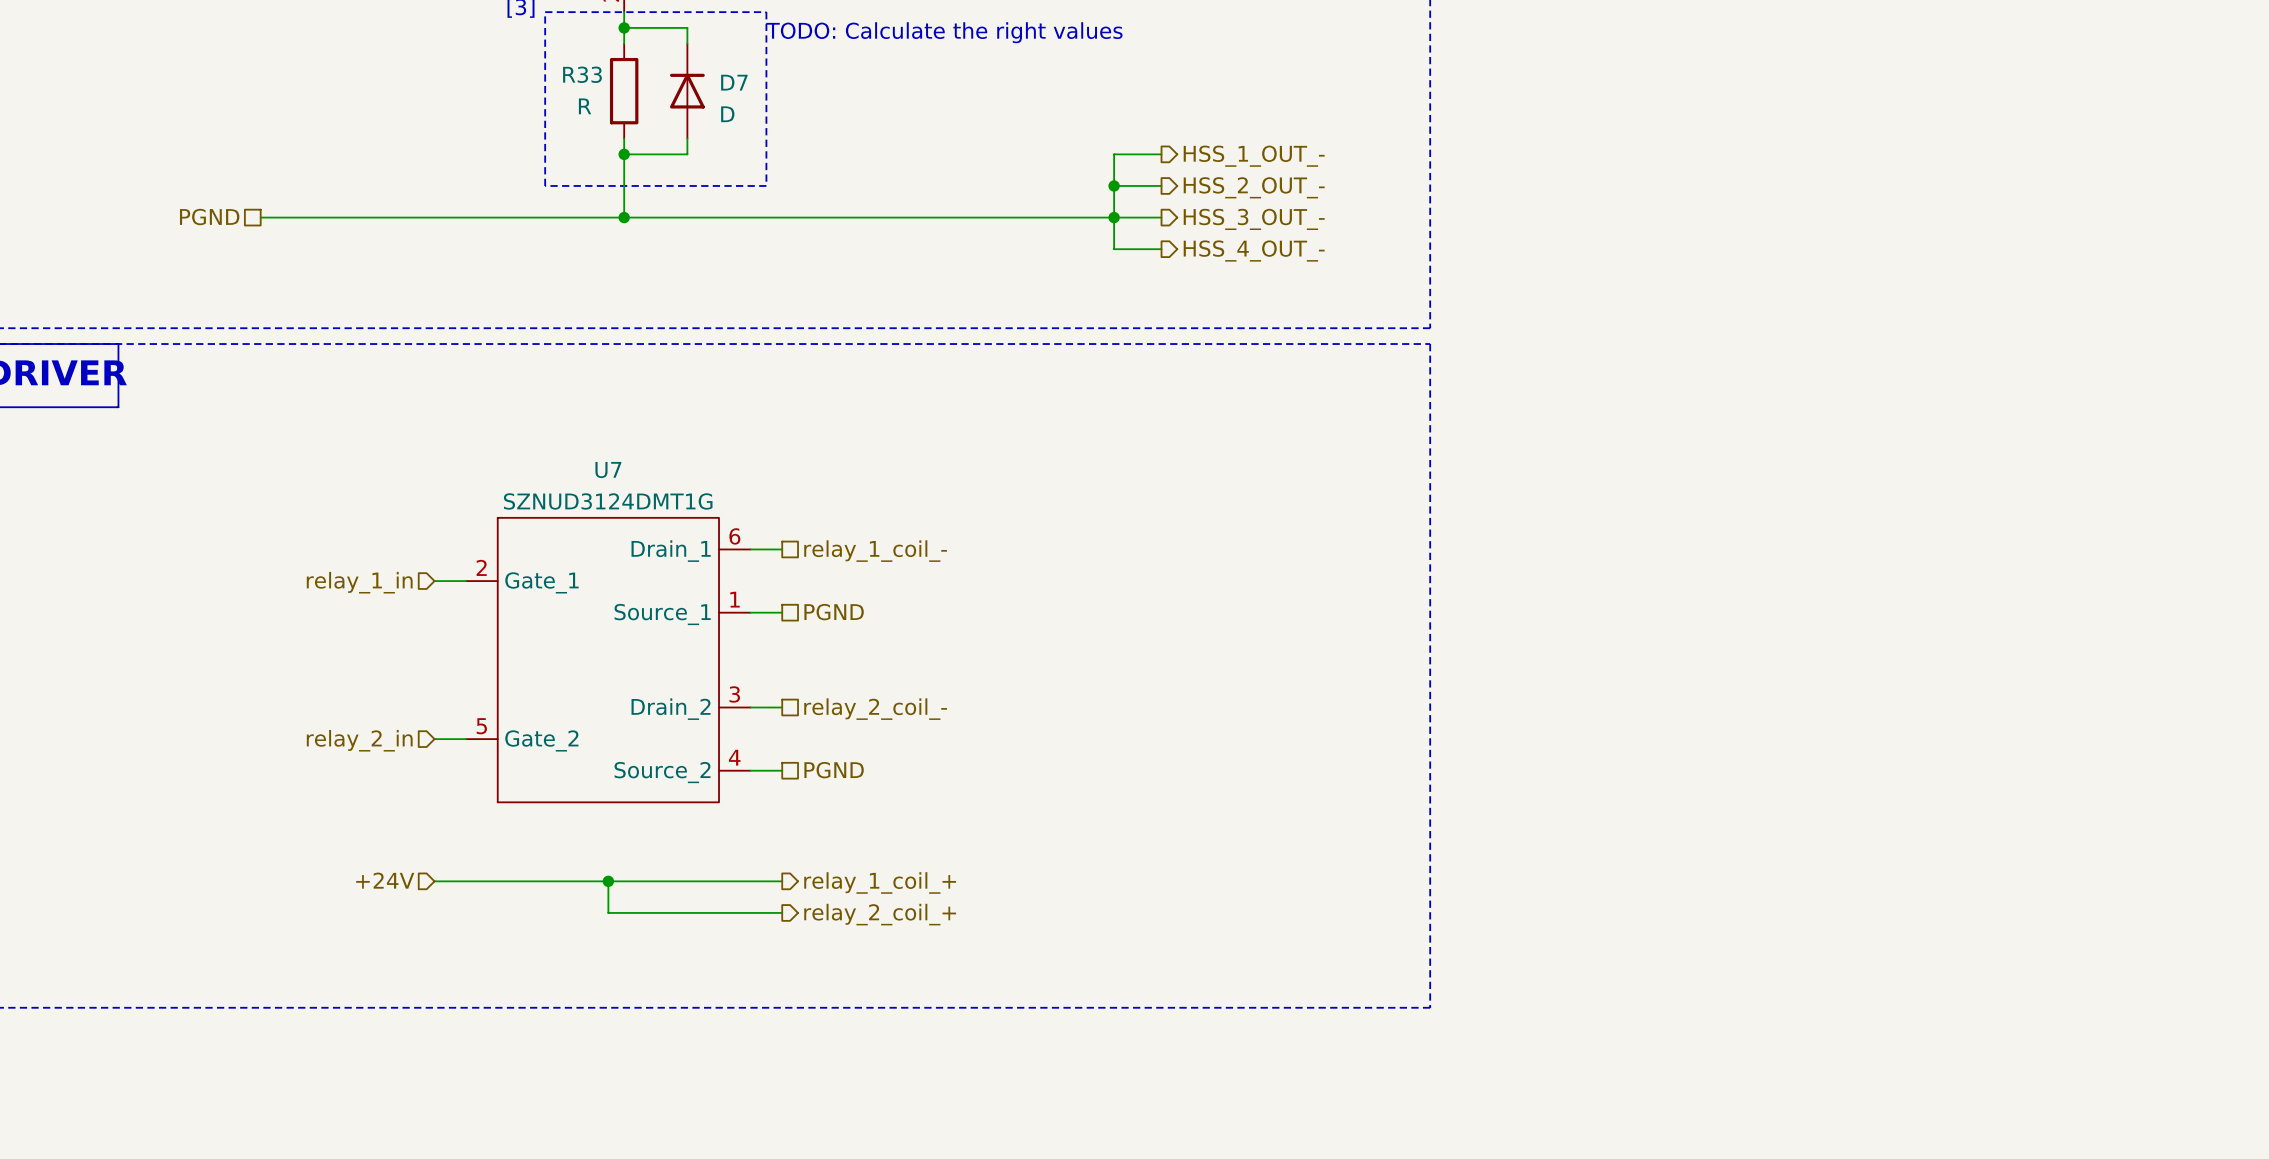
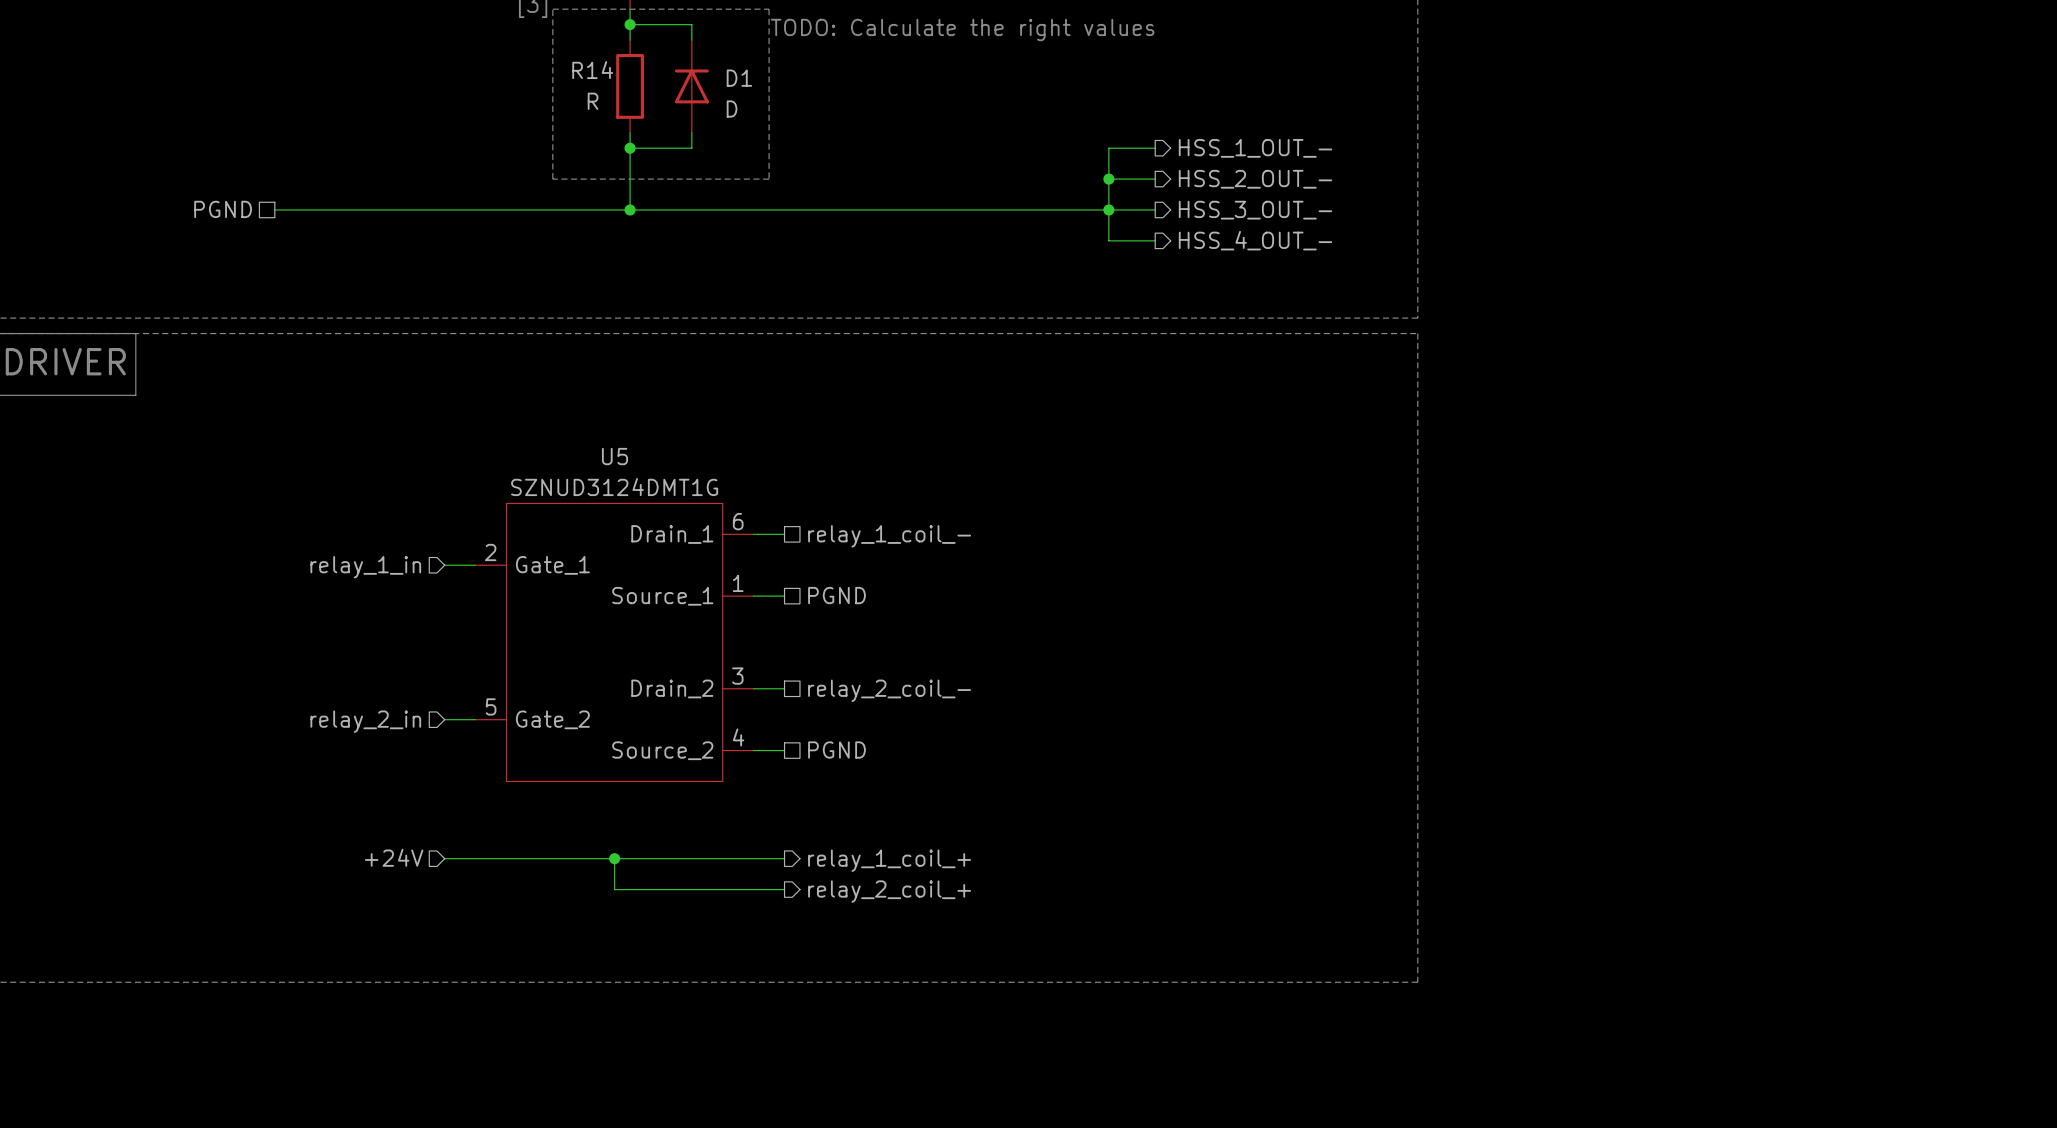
R33 name: R33 (582, 74) -> R14 (592, 70)
D7 name: D7 (734, 82) -> D1 (739, 78)
U7 name: U7 (608, 470) -> U5 (614, 456)

